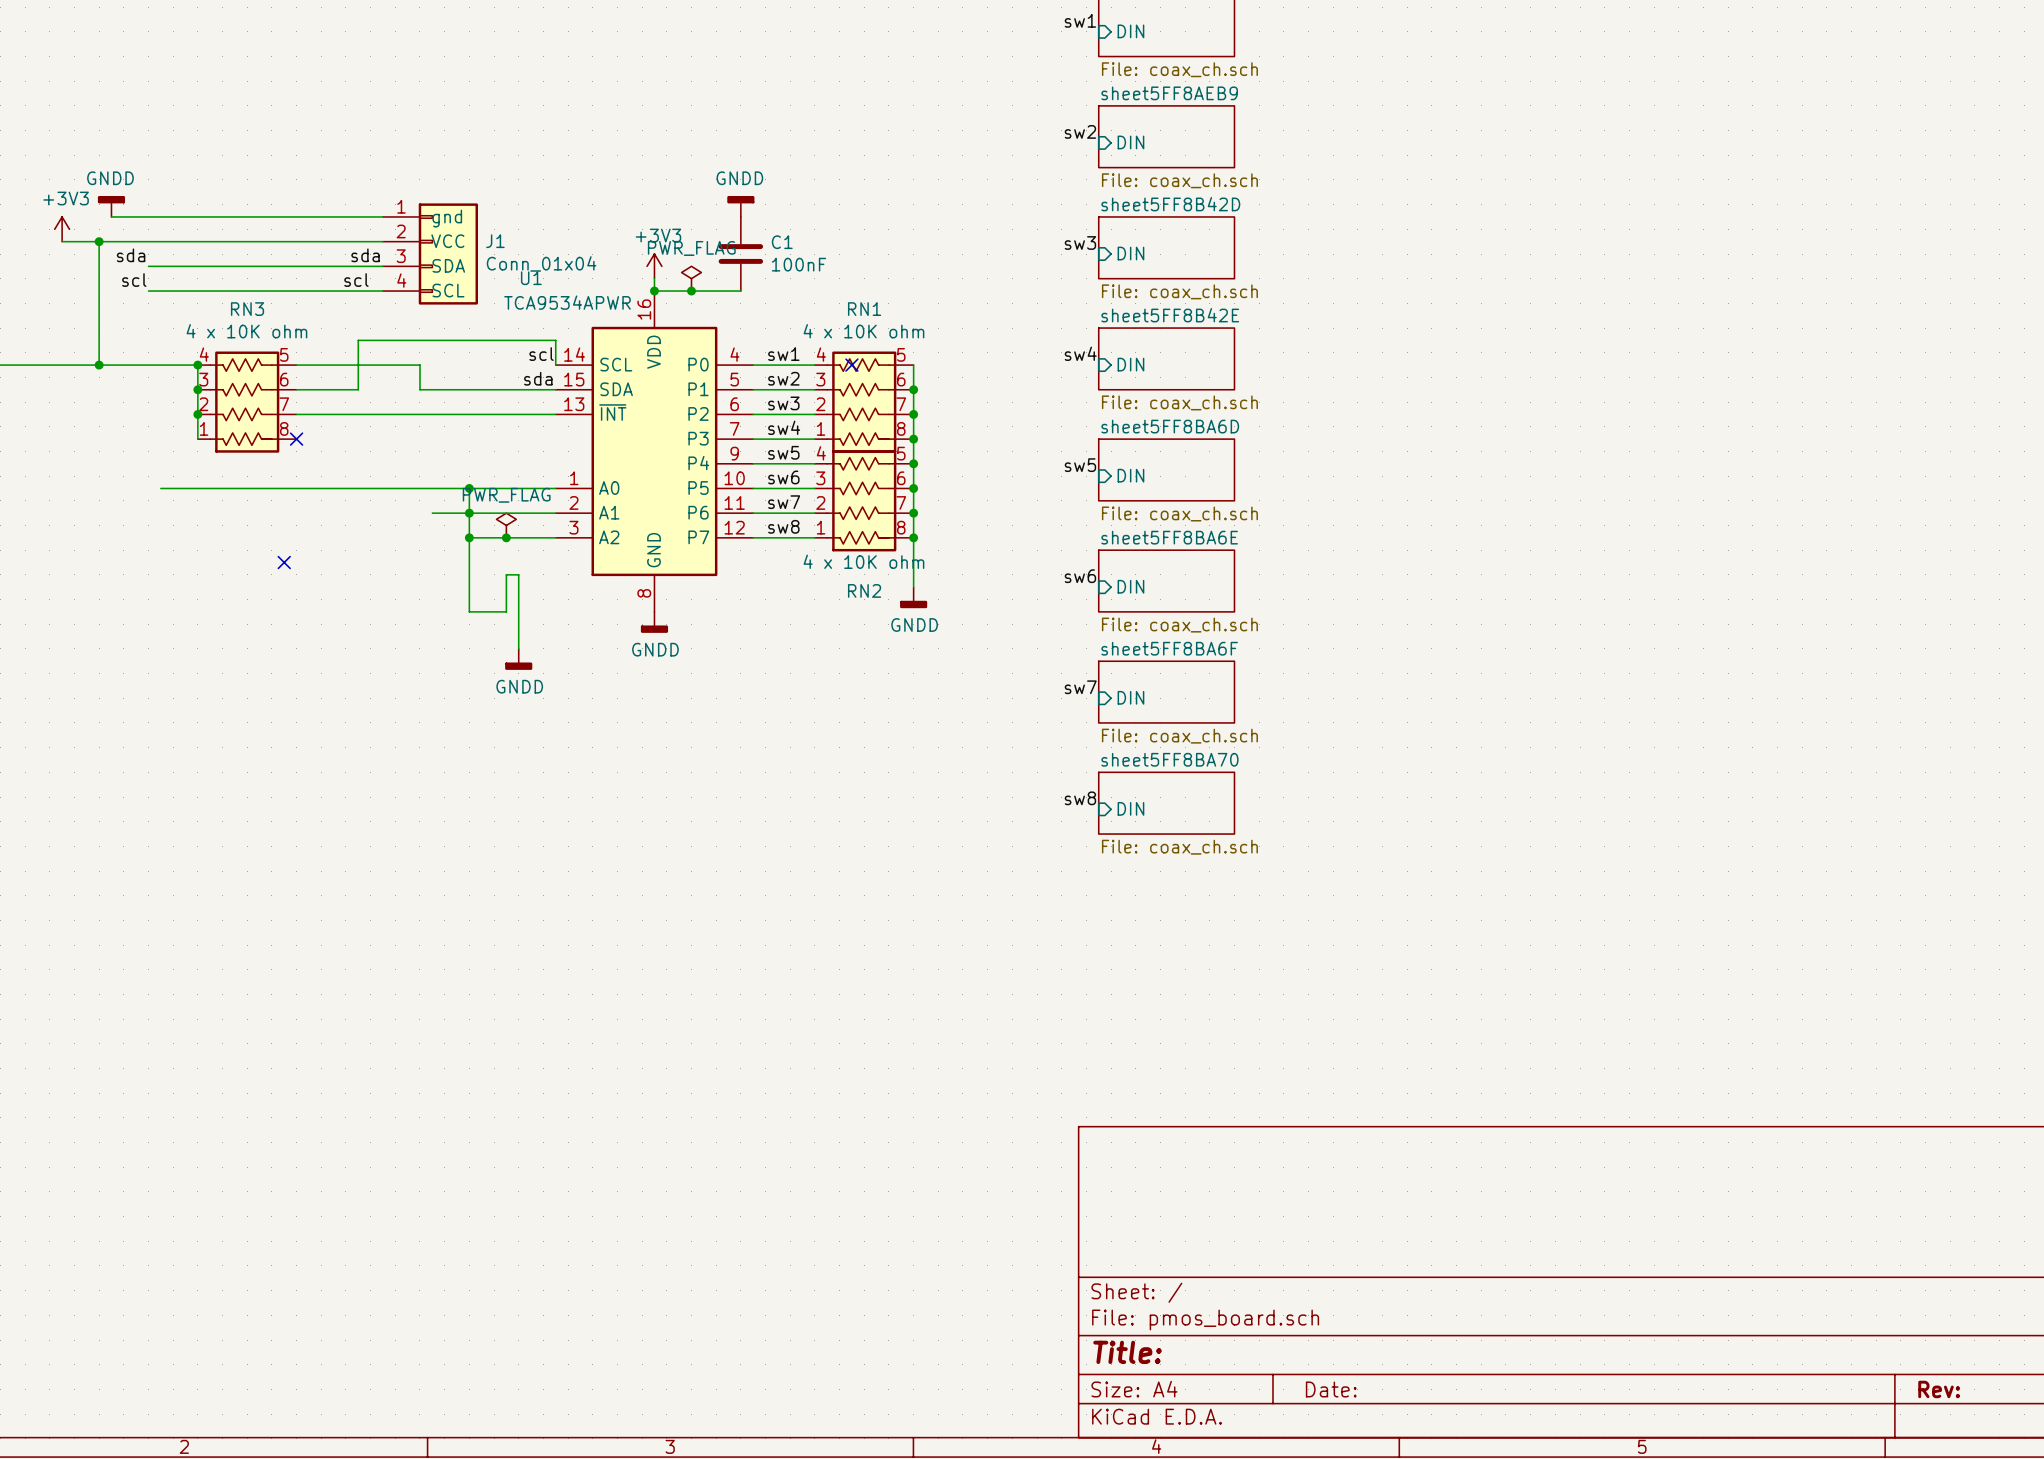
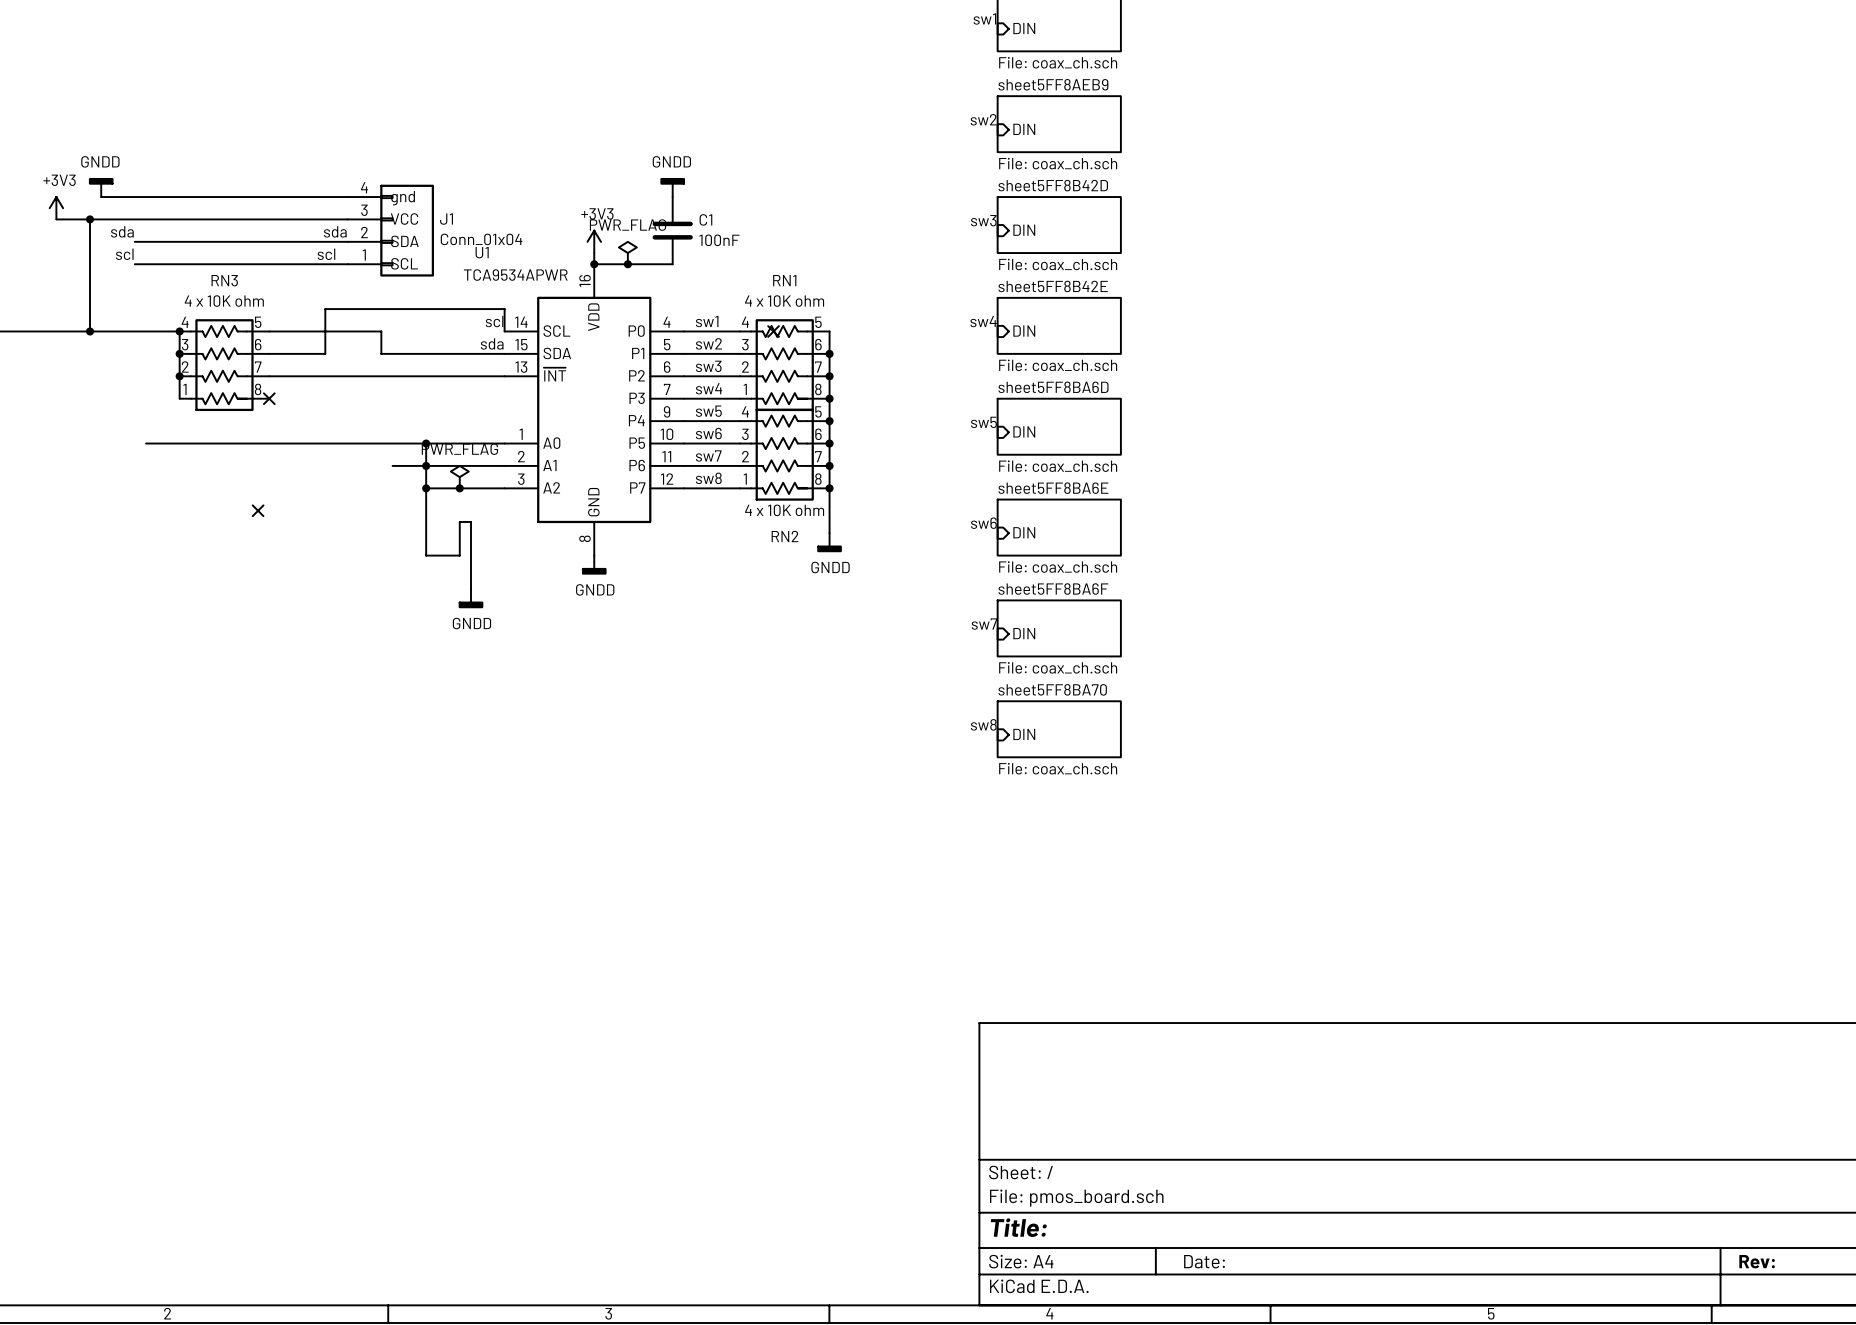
J1 pin number: 1 (401, 206) -> 4 (364, 187)
J1 pin number: 2 (401, 231) -> 3 (364, 210)
J1 pin number: 3 (401, 256) -> 2 (364, 232)
J1 pin number: 4 (401, 280) -> 1 (364, 255)

